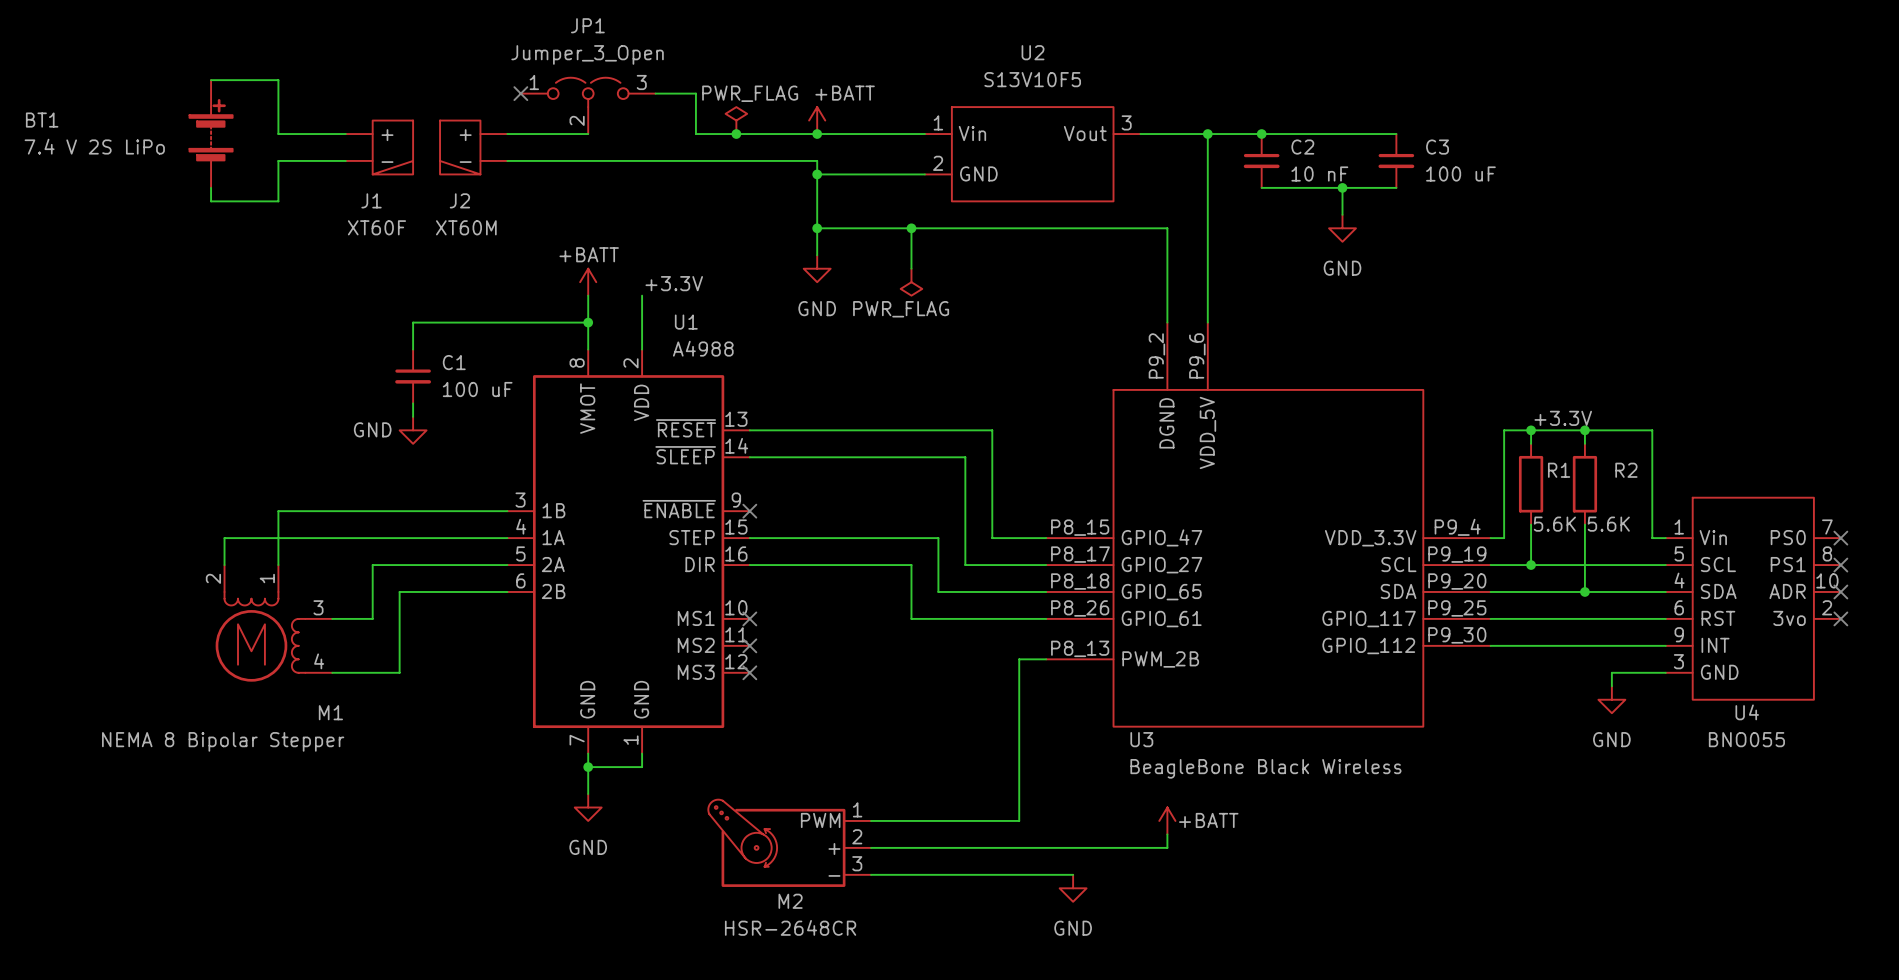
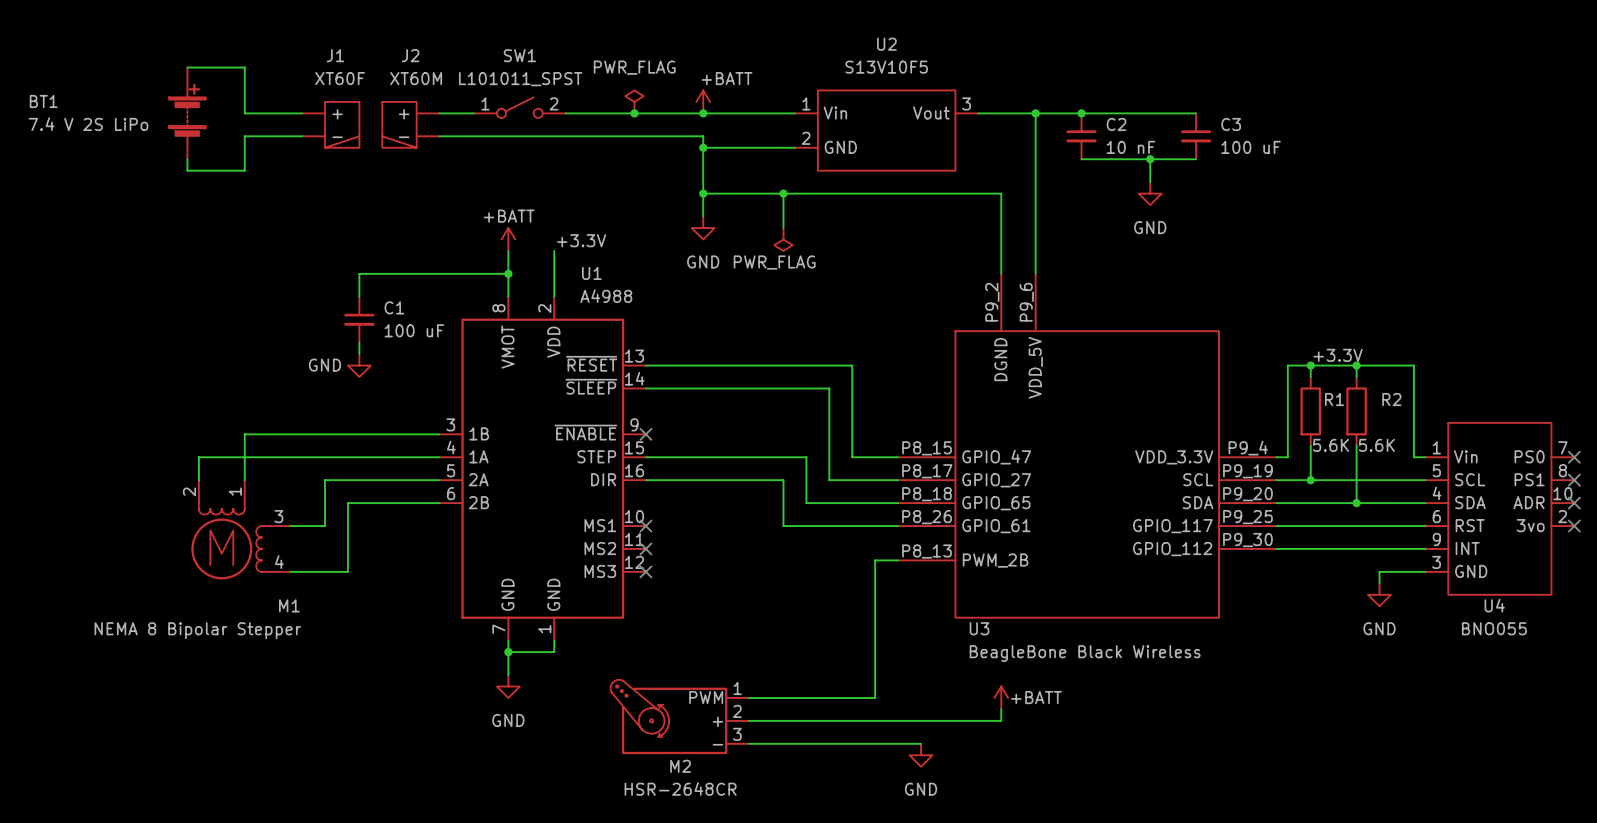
no-connect mark: (520, 93) -> none
wire: (655, 93) (695, 93) (695, 134) -> (565, 113) (600, 113)
power symbol text position: PWR_FLAG (750, 93) -> PWR_FLAG (634, 67)
JP1: Jumper_3_Open (588, 105) -> none
SW1: none -> L101011_SPST (519, 107)
J1 name position: J1 (371, 200) -> J1 (335, 55)
J2 name position: J2 (459, 200) -> J2 (410, 55)
J1 value position: XT60F (376, 227) -> XT60F (340, 78)
J2 value position: XT60M (466, 227) -> XT60M (416, 78)

